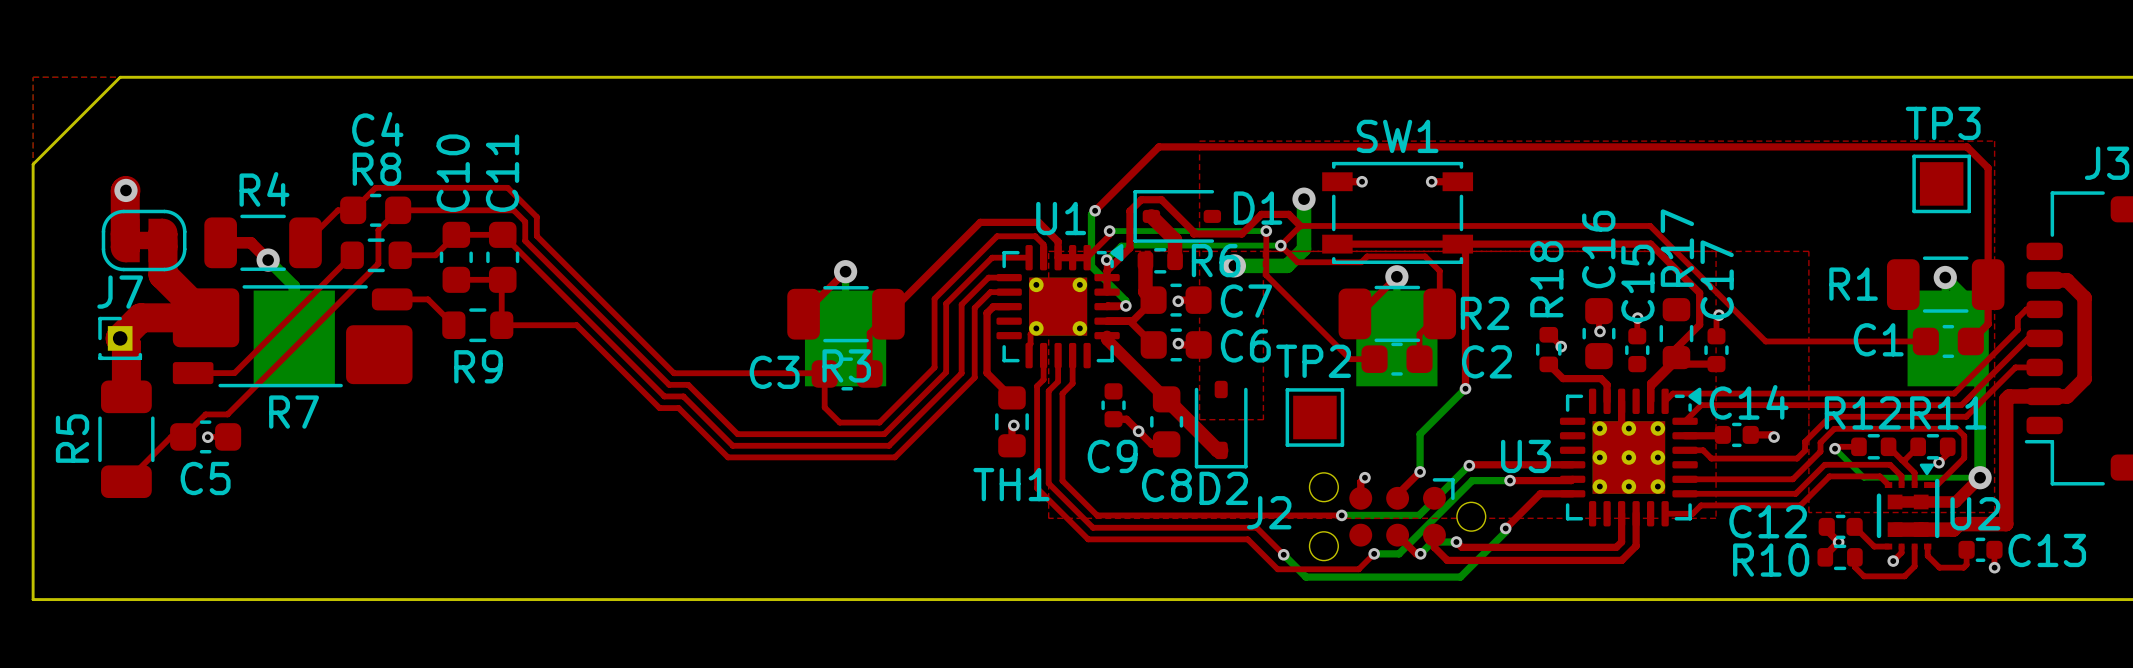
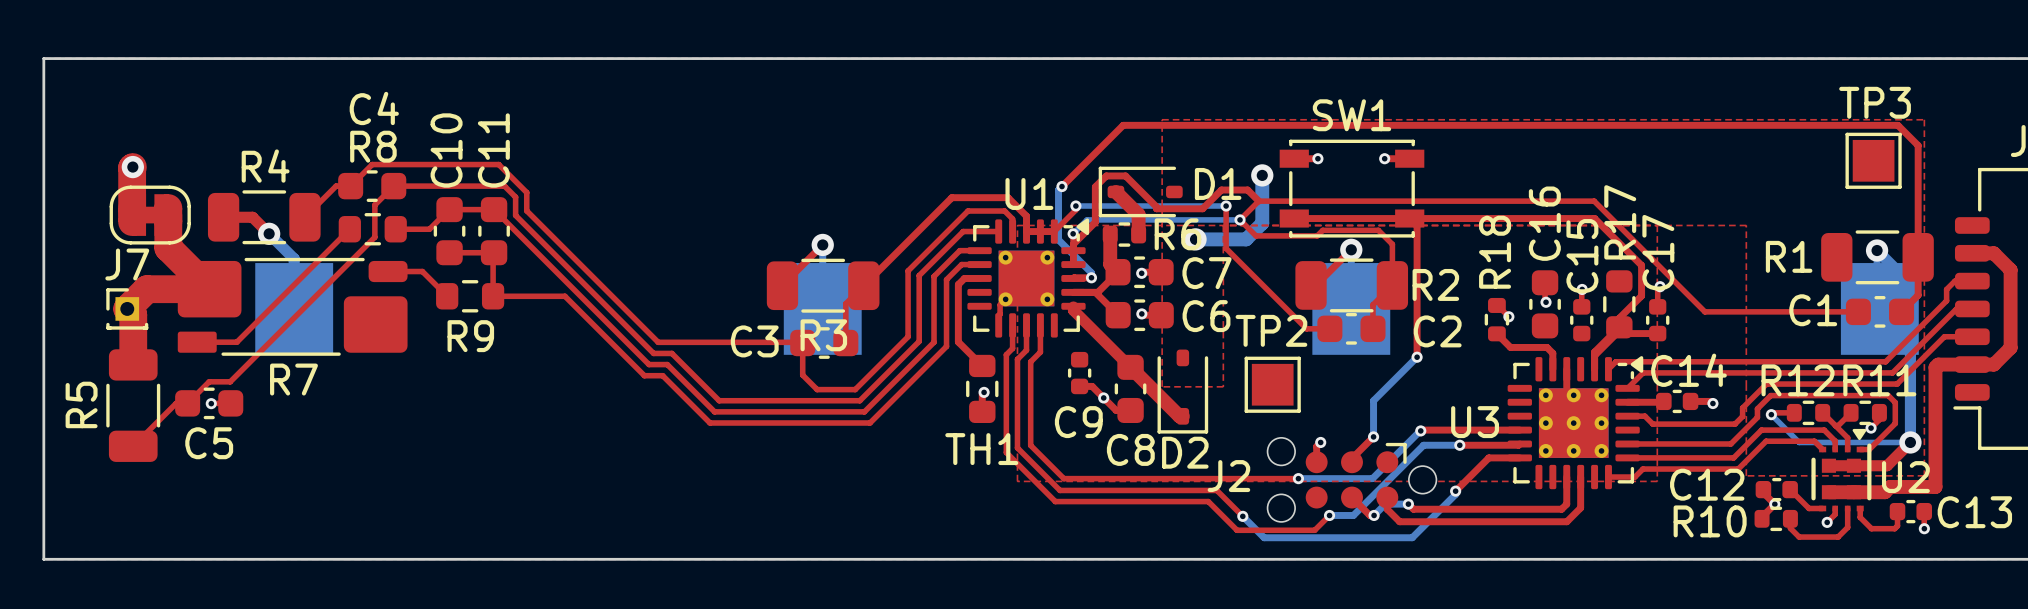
board edge: (120, 77) (33, 164) -> (127, 58) (43, 58) (43, 142)

